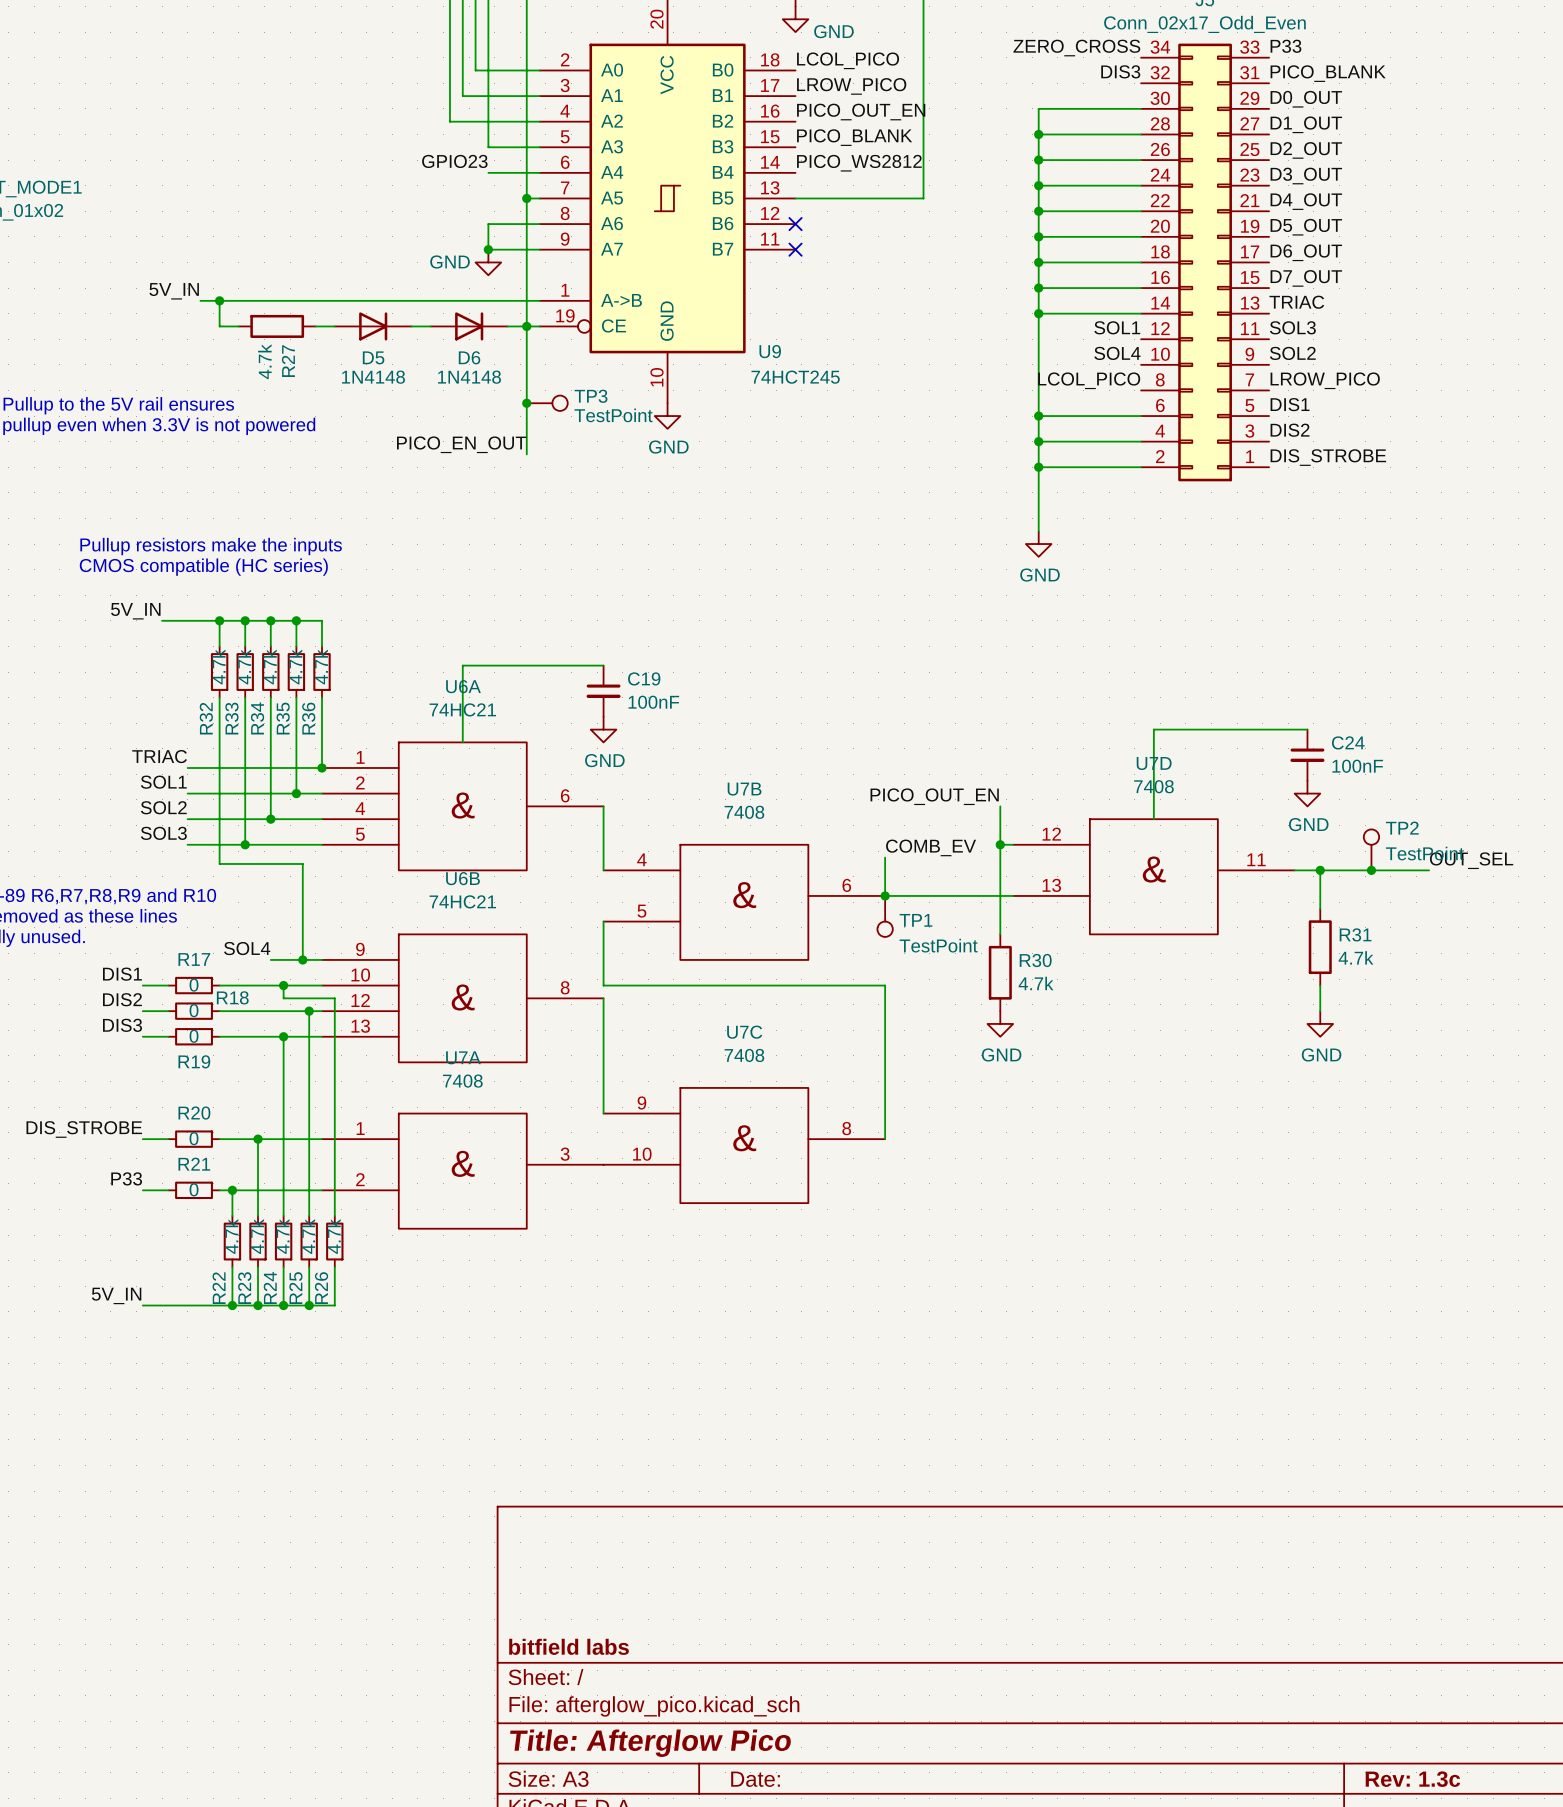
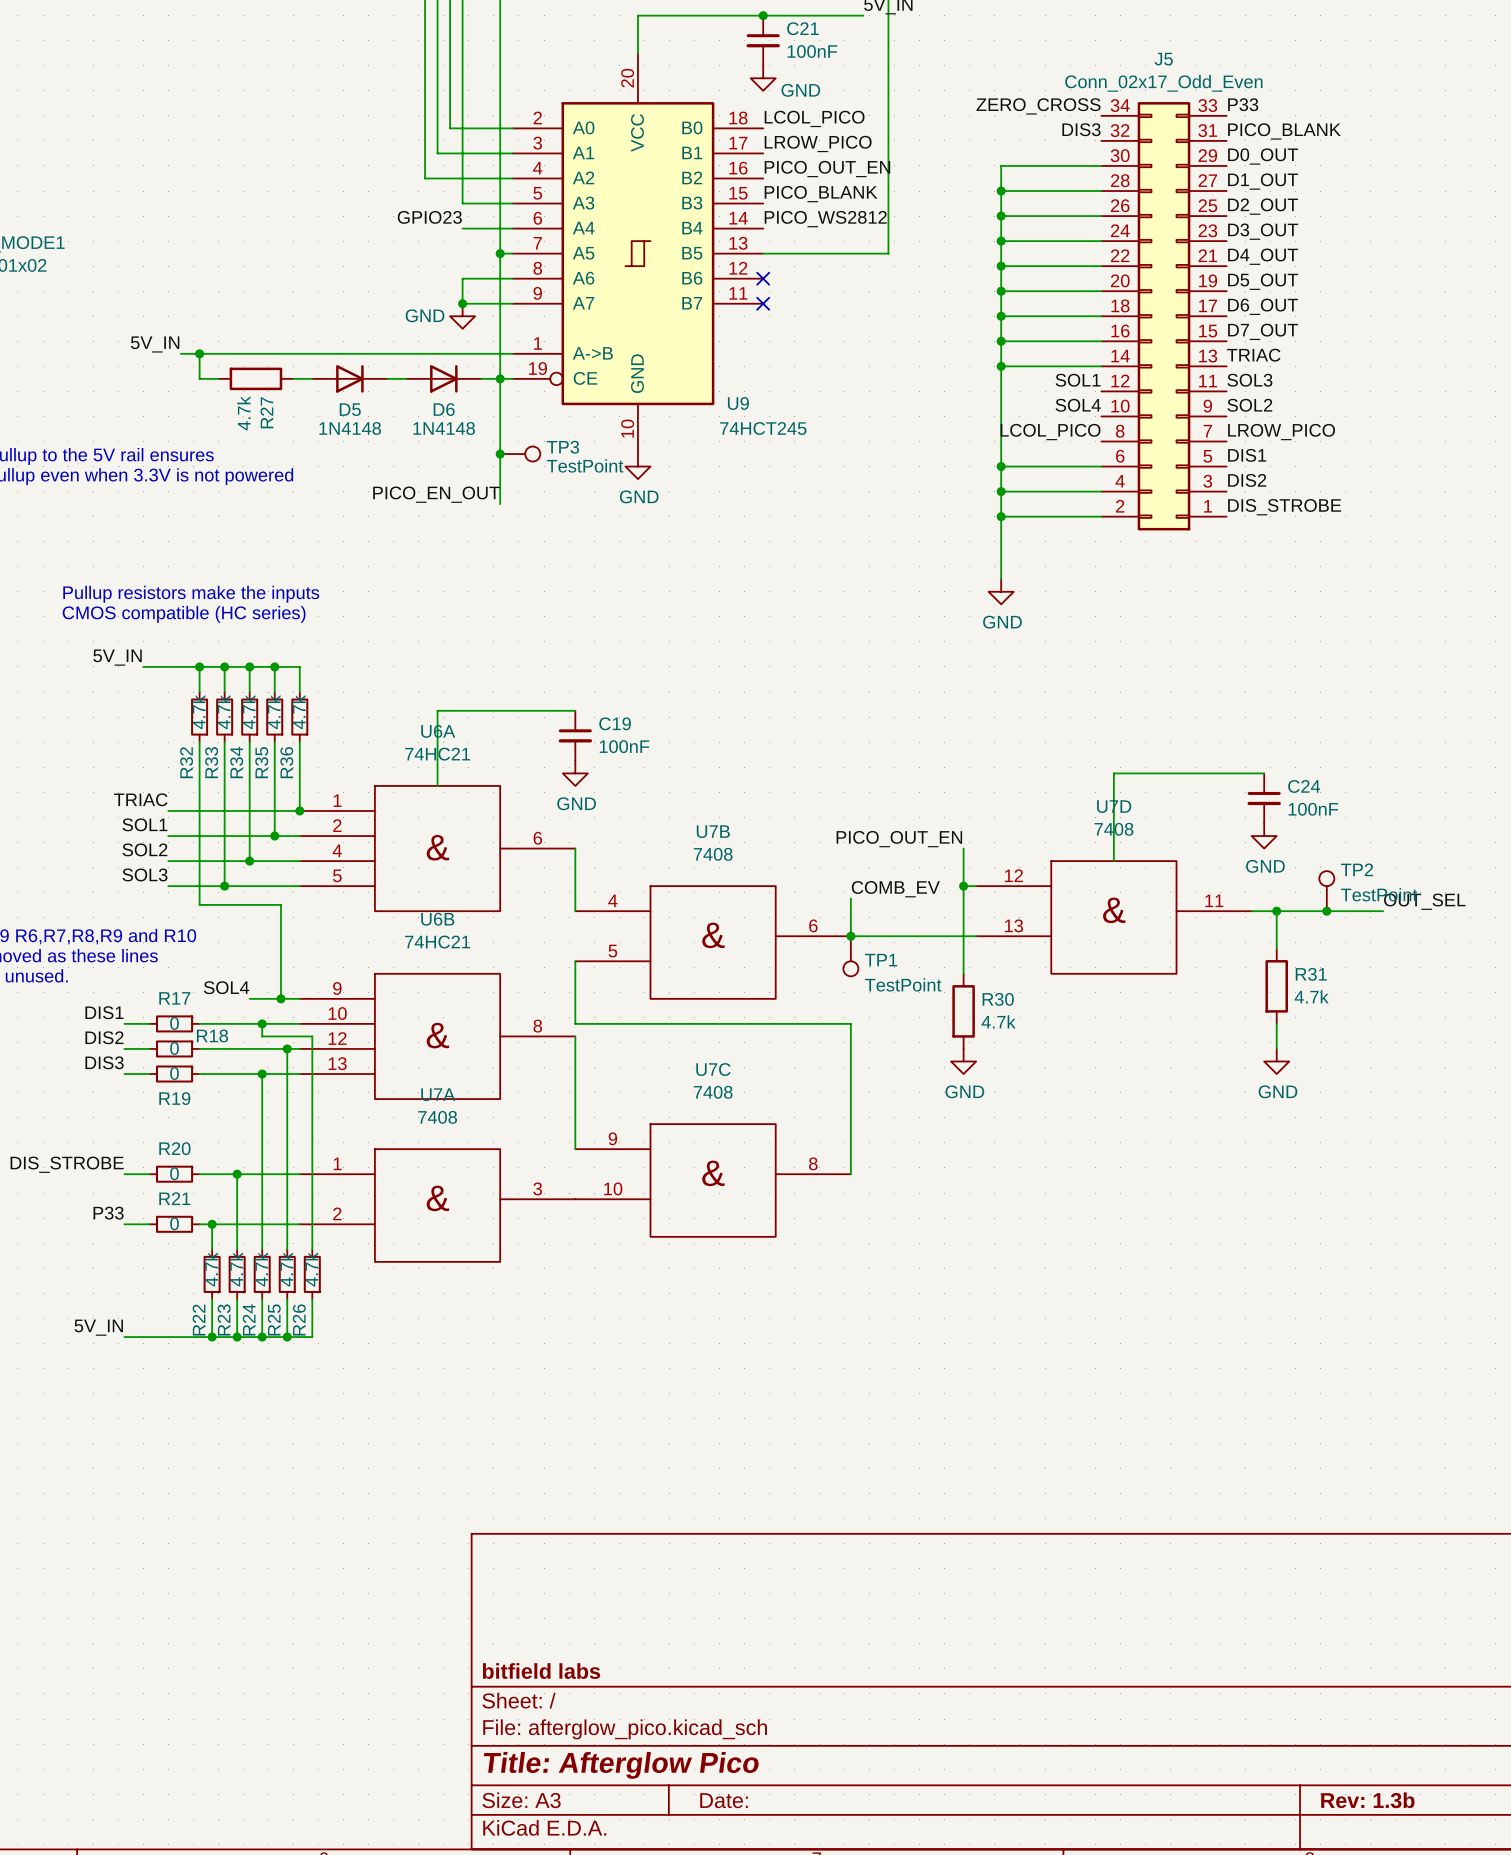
title block: Rev: 1.3c (1412, 1779) -> Rev: 1.3b (1367, 1800)

